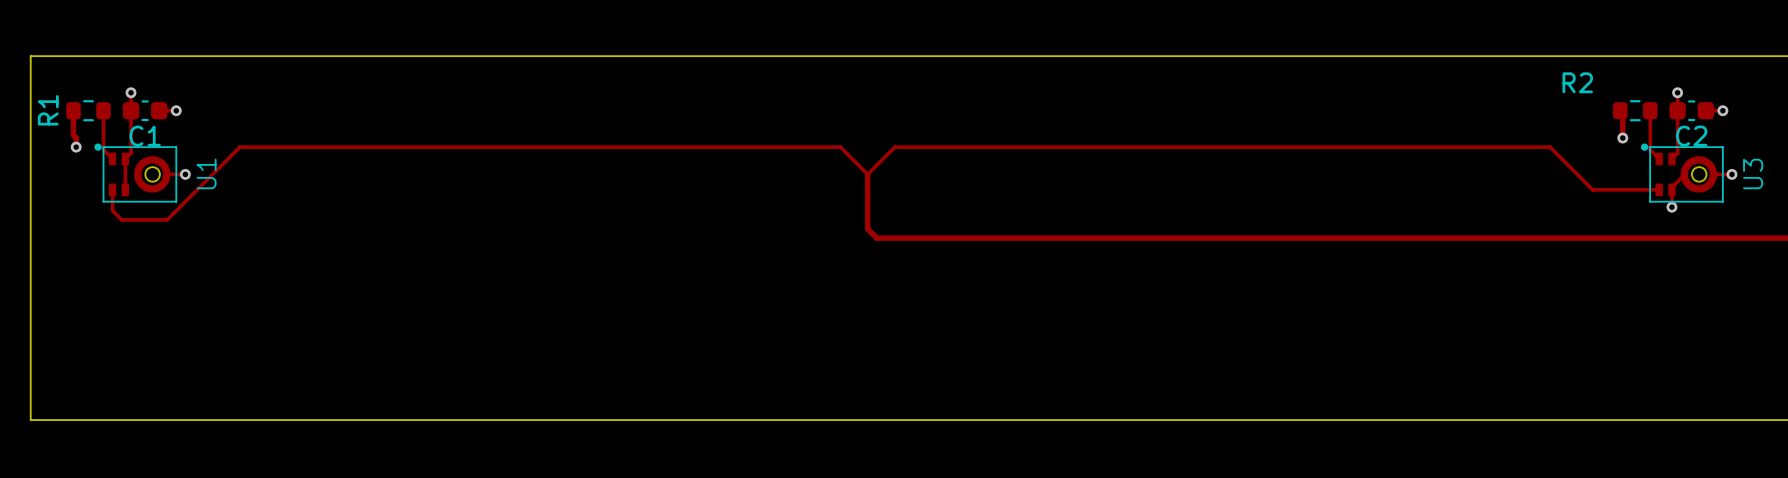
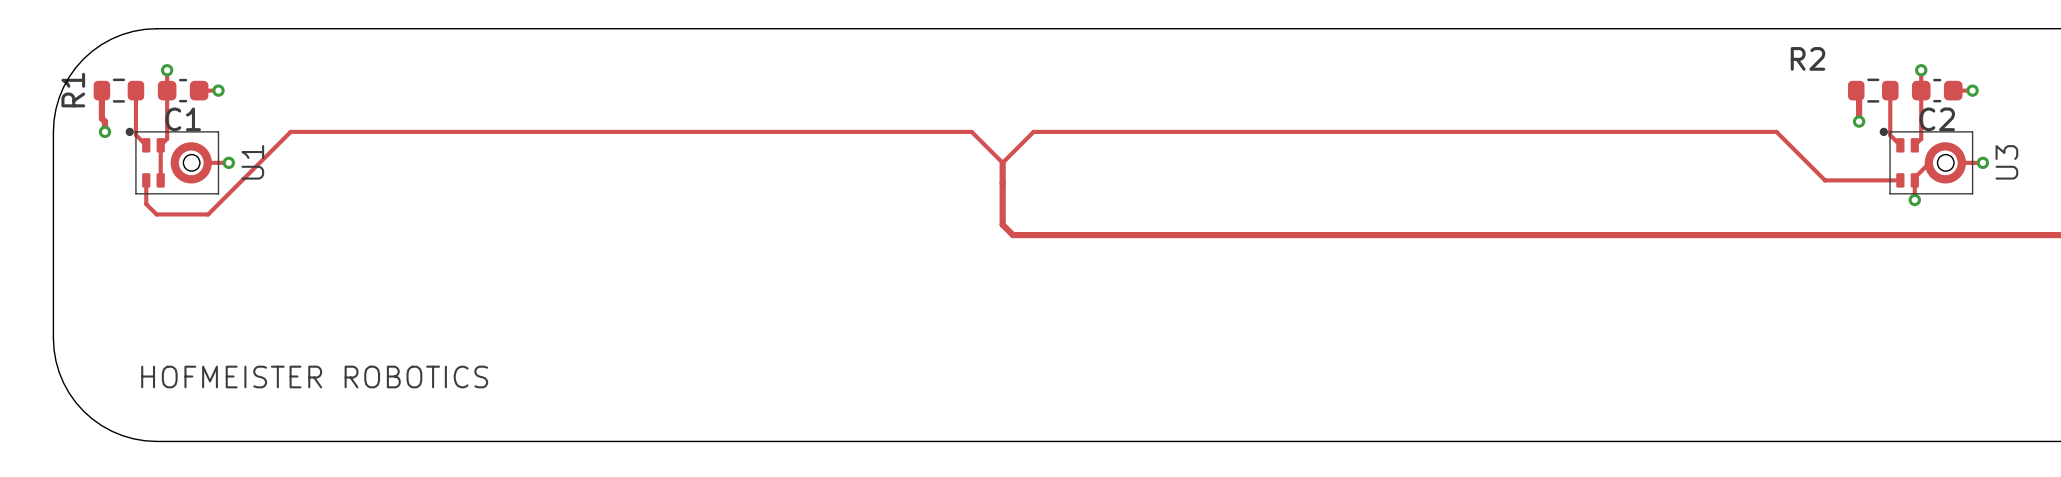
board edge: (121, 56) (30, 56) (30, 147) -> (156, 28) (122, 34) (101, 44) (83, 58) (69, 77) (59, 97) (53, 131)
board edge: (30, 329) (30, 420) (121, 420) -> (53, 338) (59, 372) (69, 393) (83, 411) (101, 425) (122, 435) (156, 441)
text: none -> HOFMEISTER ROBOTICS (314, 377)

